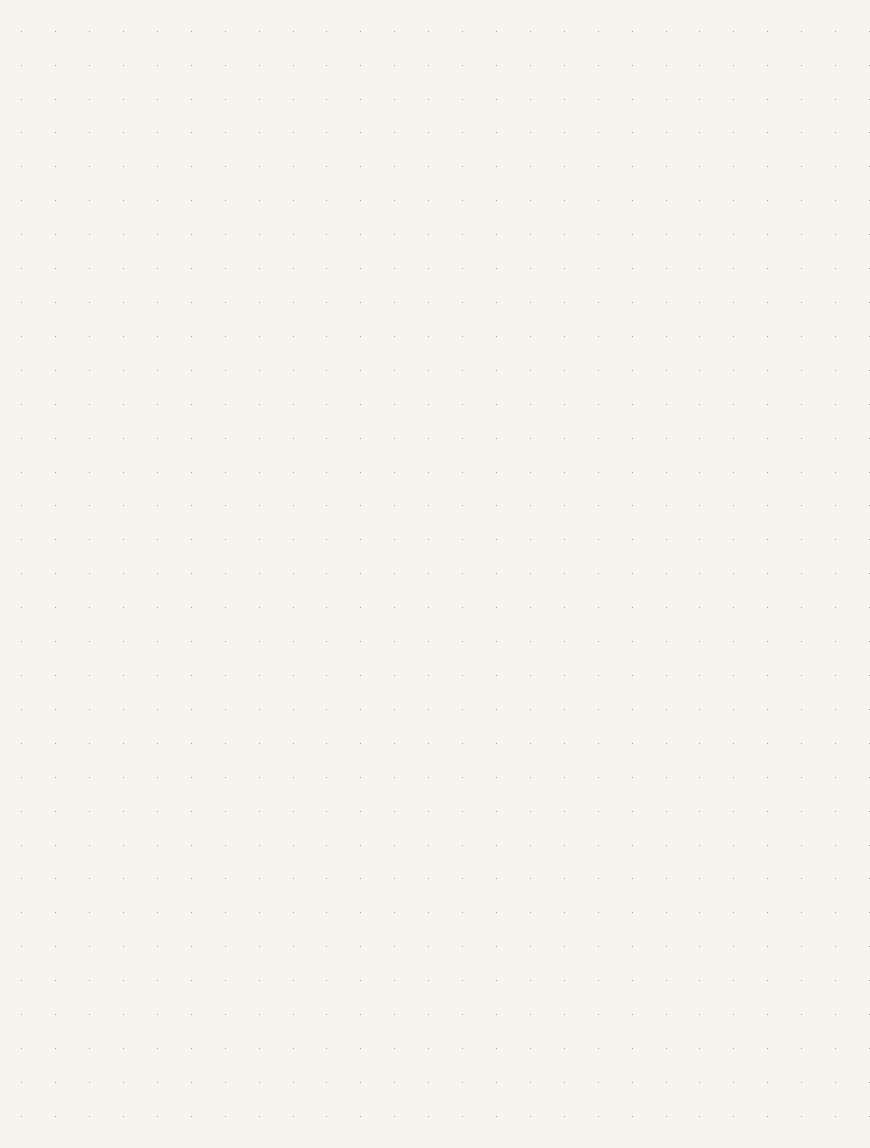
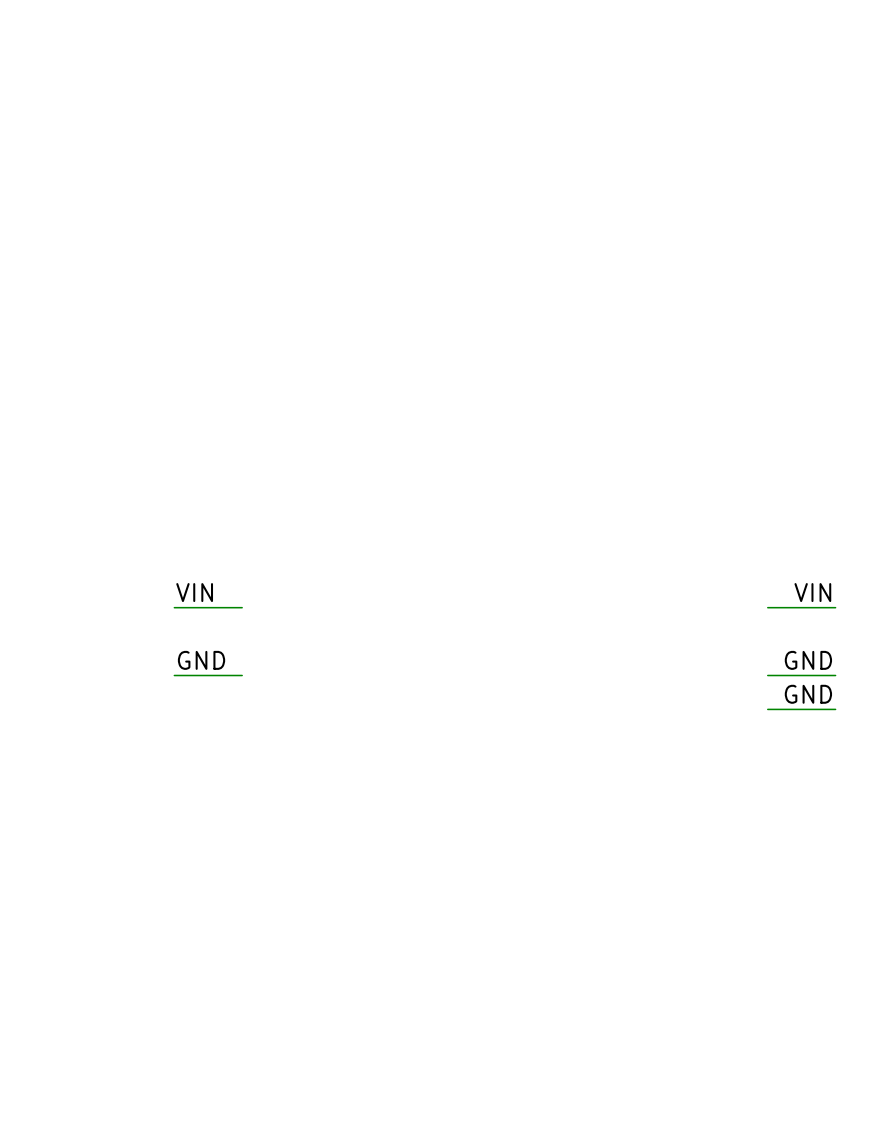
label: none -> VIN (194, 592)
label: none -> VIN (812, 592)
wire: none -> (174, 607) (242, 607)
wire: none -> (767, 607) (835, 607)
label: none -> GND (201, 660)
label: none -> GND (808, 660)
wire: none -> (174, 675) (242, 675)
wire: none -> (767, 675) (835, 675)
label: none -> GND (808, 694)
wire: none -> (767, 709) (835, 709)

